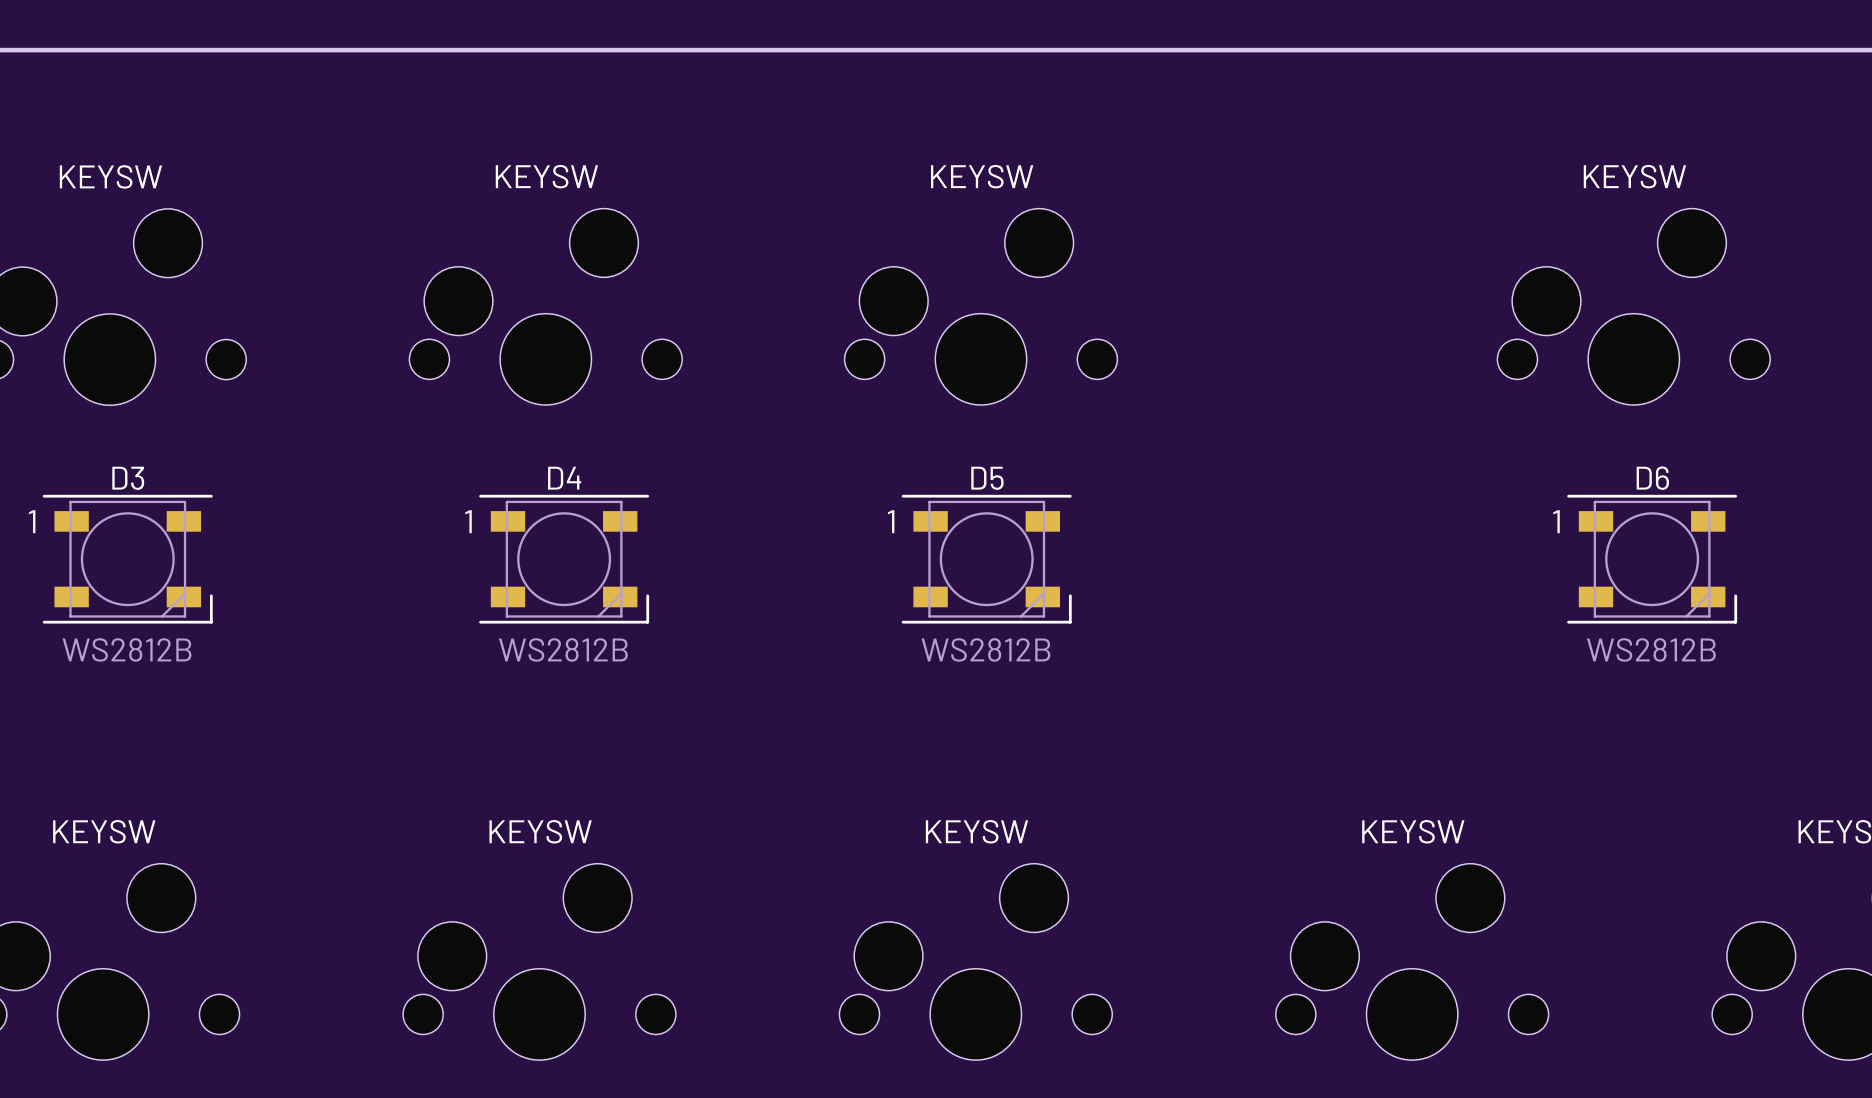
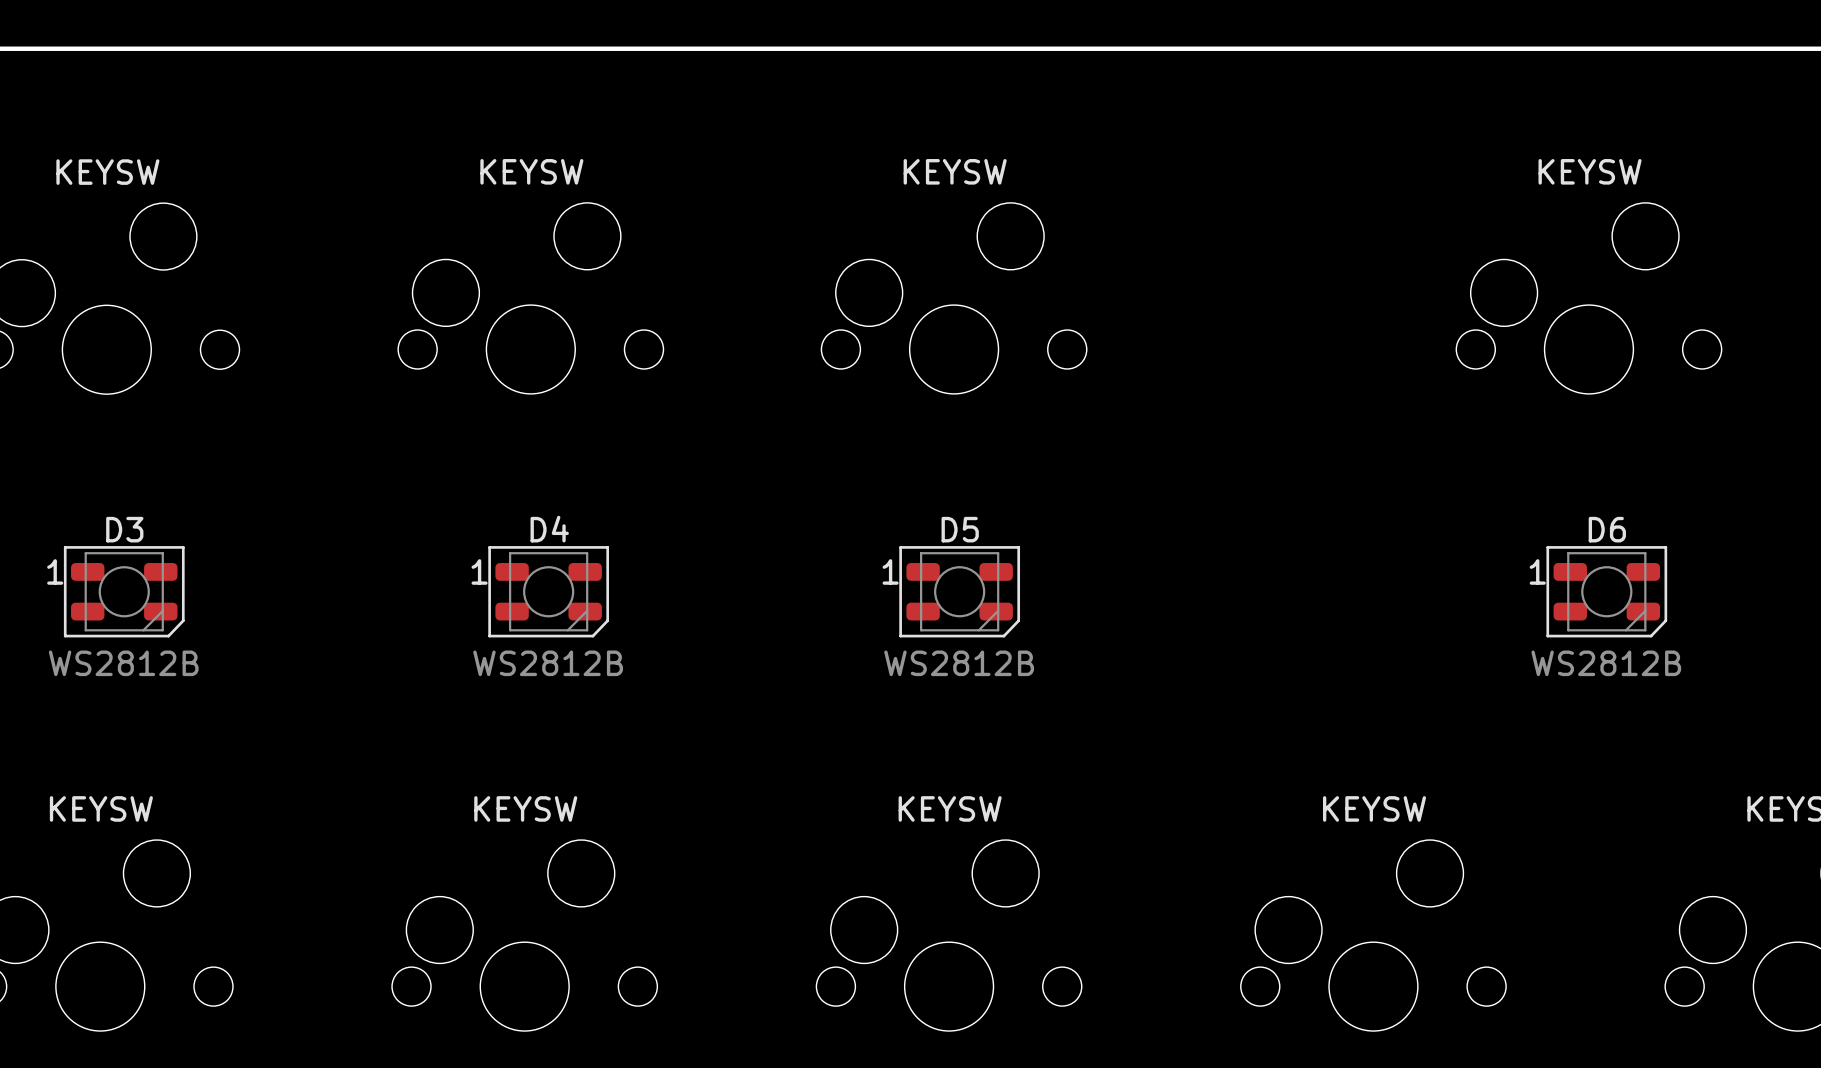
D3 footprint: [42, 494, 213, 624] -> [63, 546, 185, 638]
D4 footprint: [479, 494, 650, 624] -> [488, 546, 610, 638]
D5 footprint: [901, 494, 1072, 624] -> [899, 546, 1021, 638]
D6 footprint: [1567, 494, 1738, 624] -> [1546, 546, 1668, 638]

